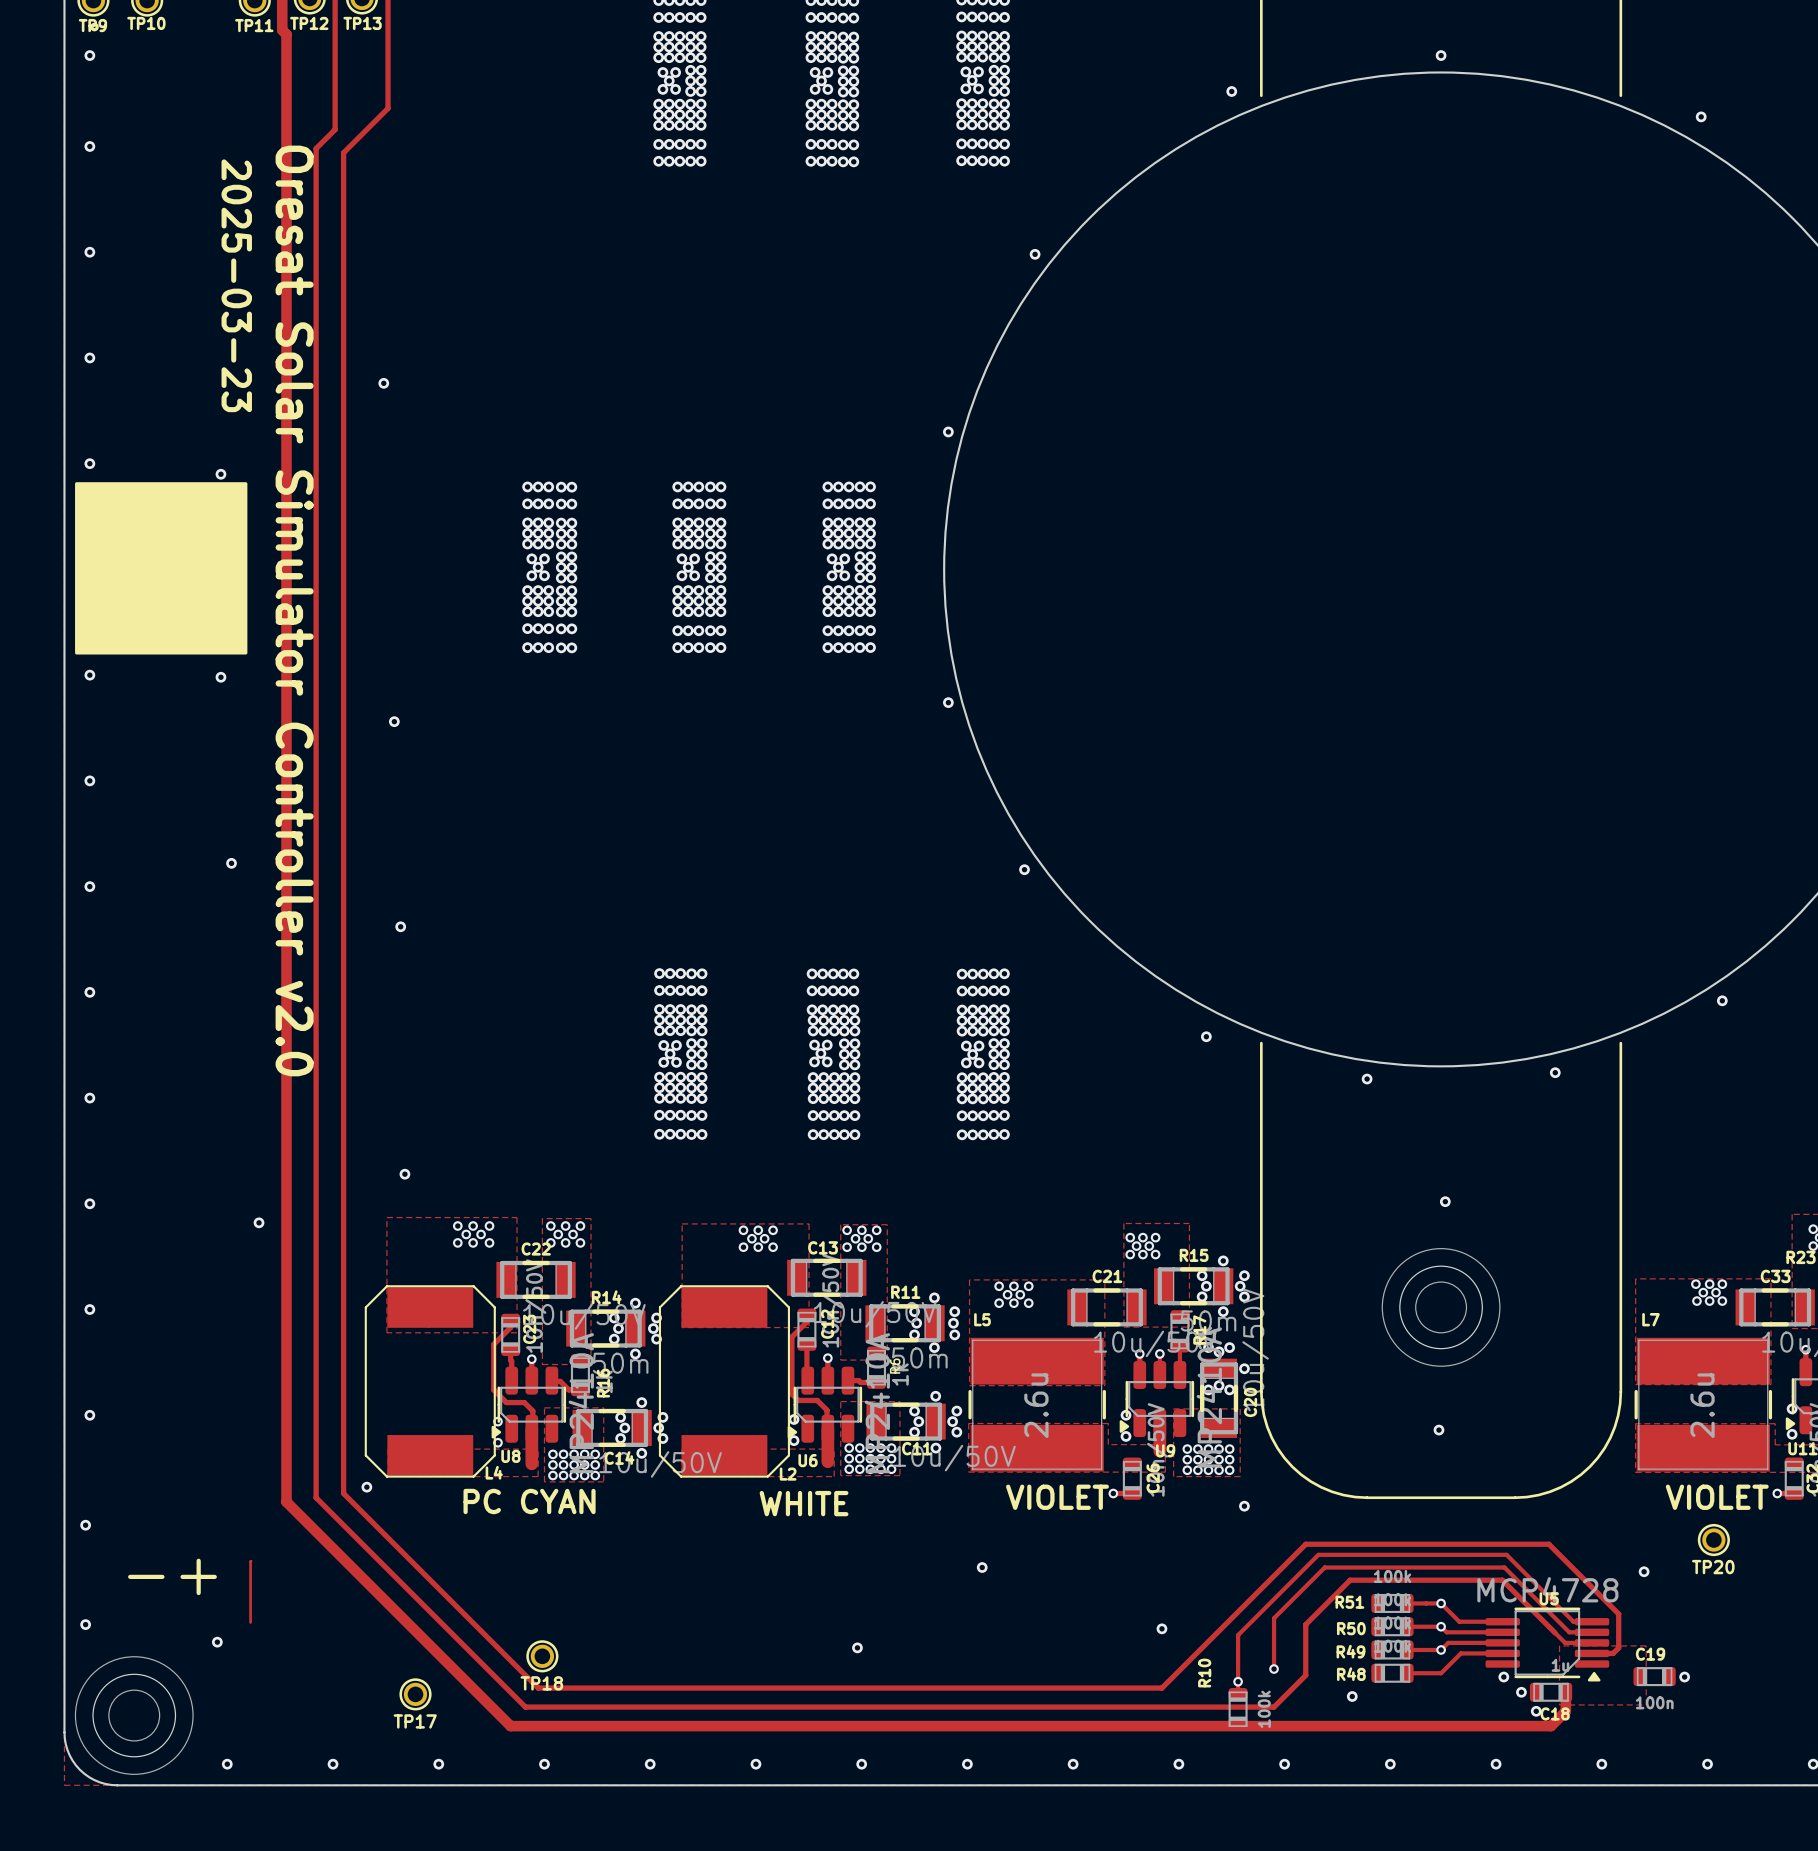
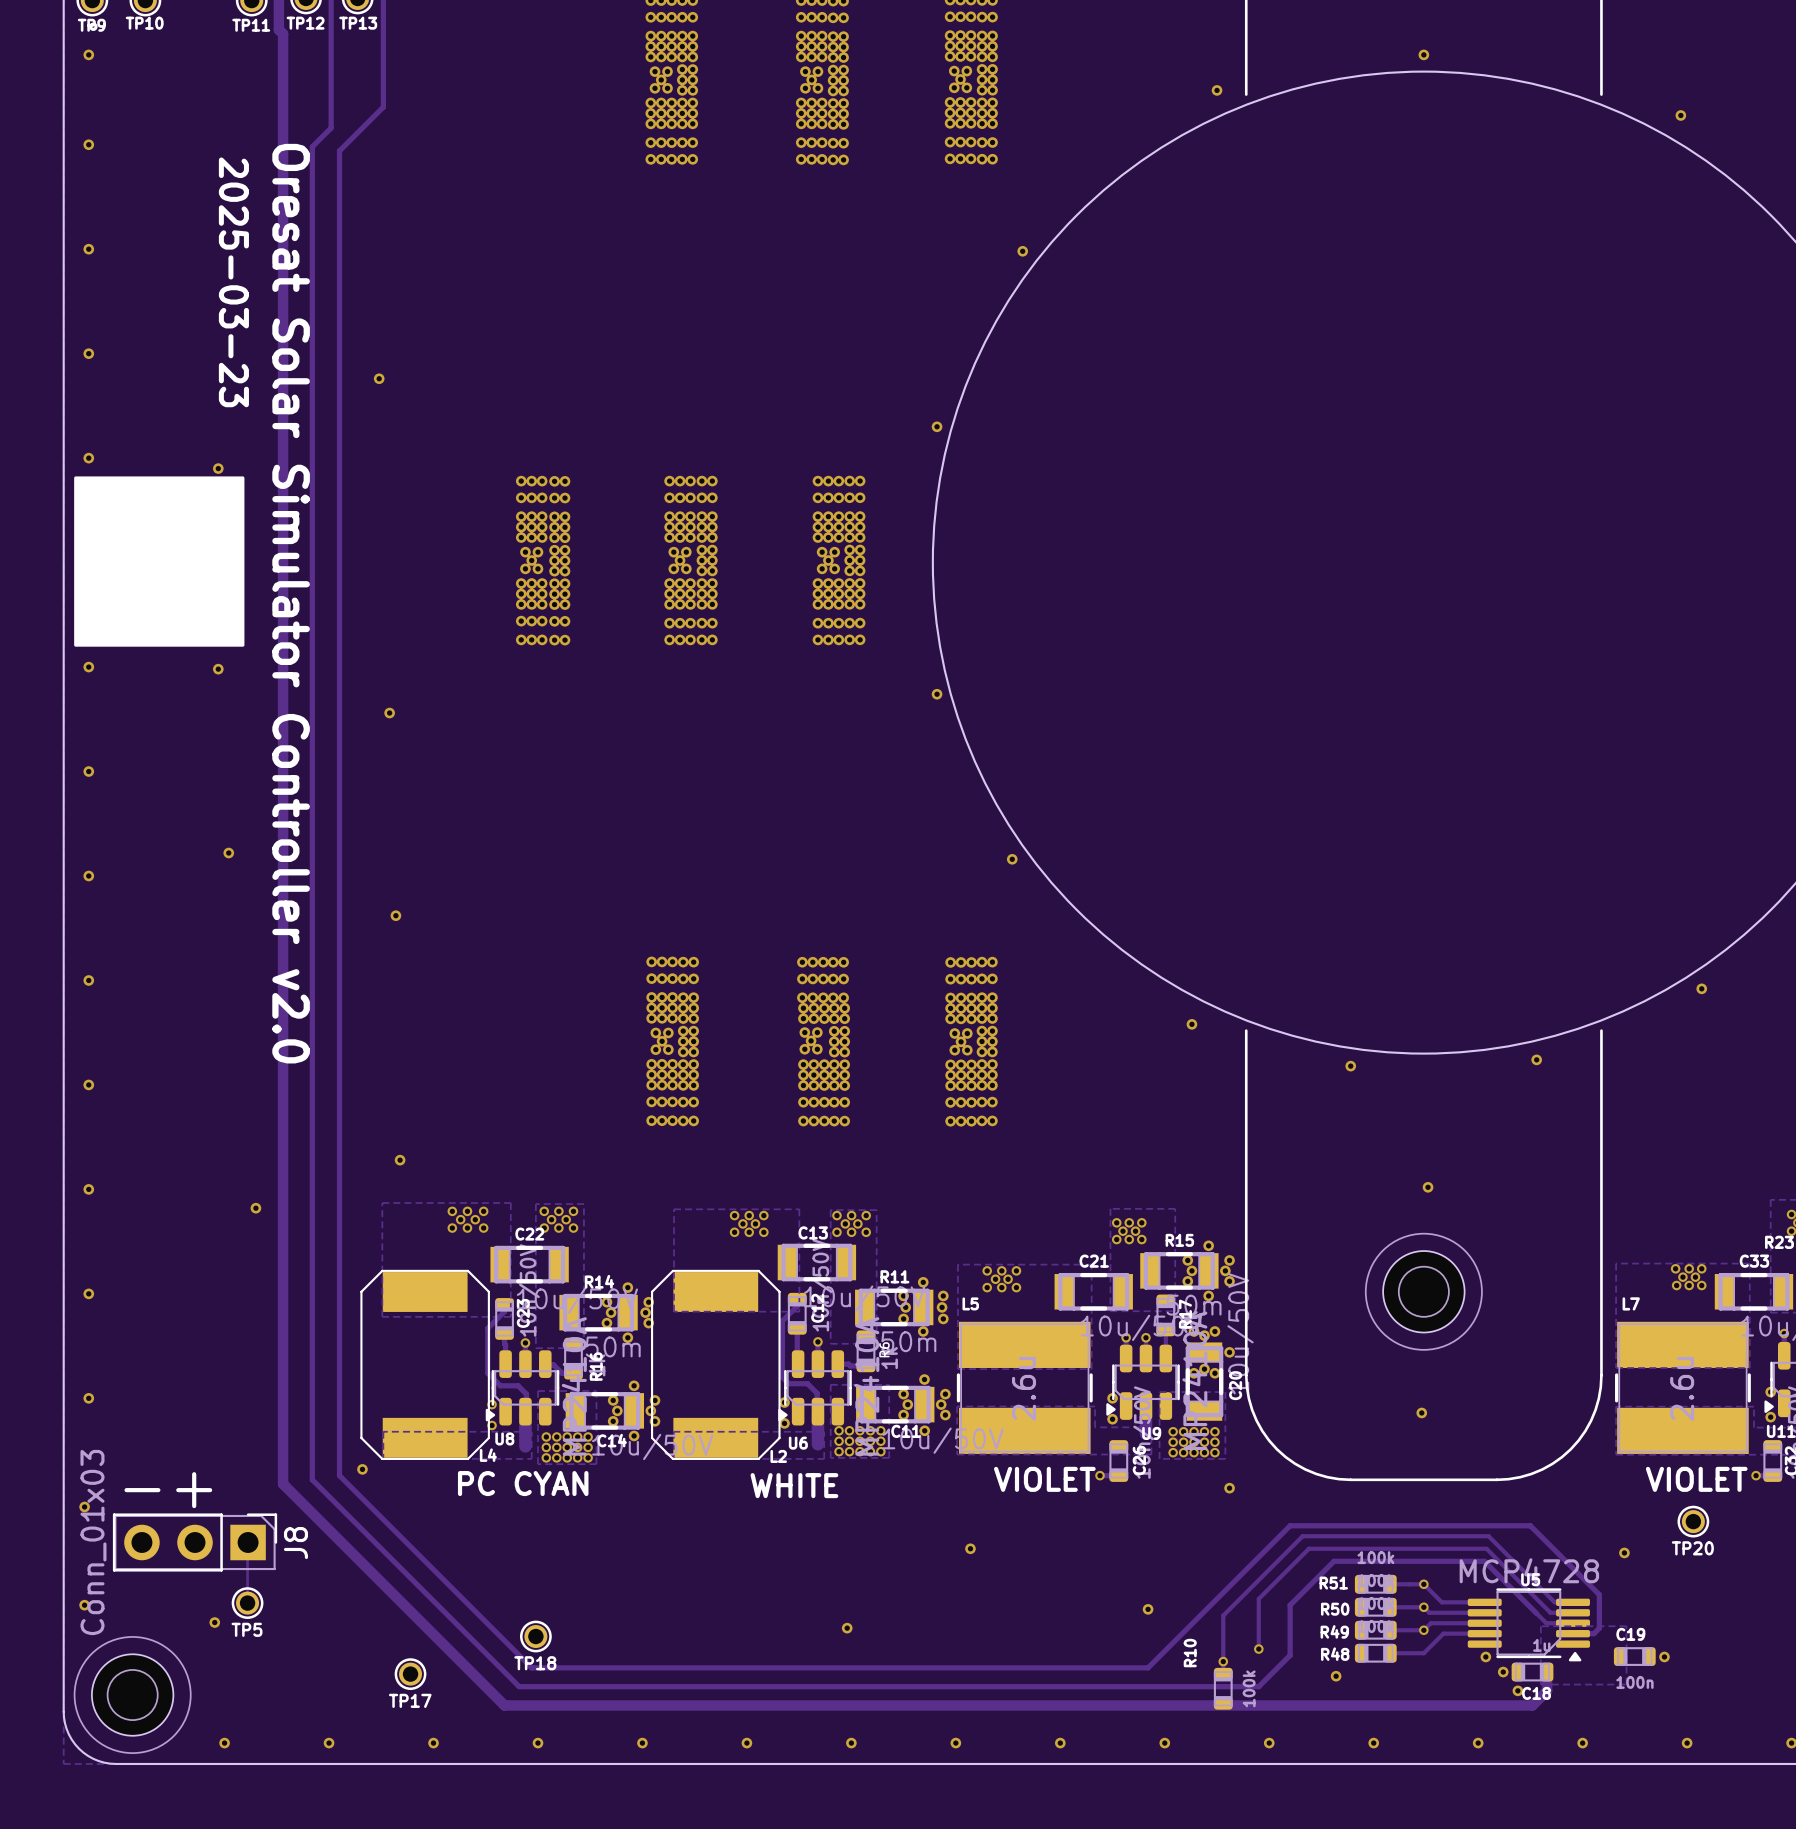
J8: none -> Conn_01x03 (195, 1542)
text position: -+ (172, 1576) -> -+ (168, 1490)
TP5: none -> (247, 1603)

